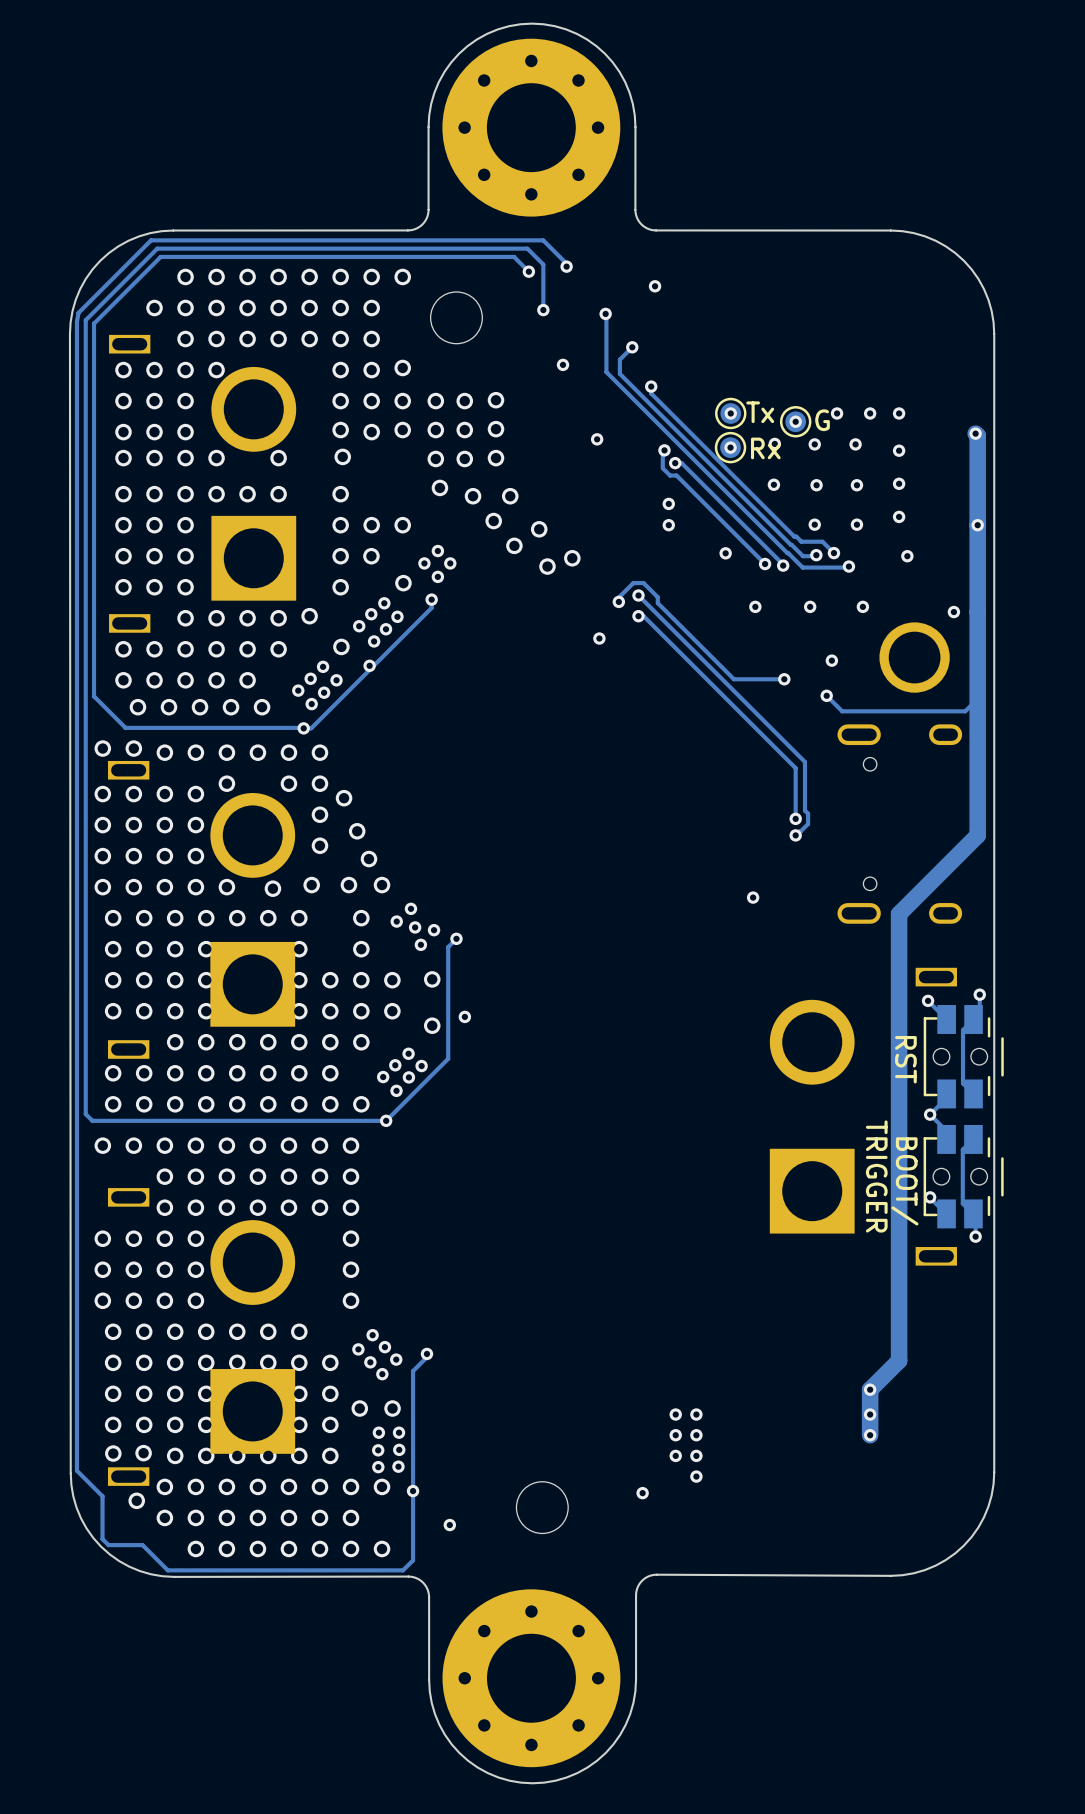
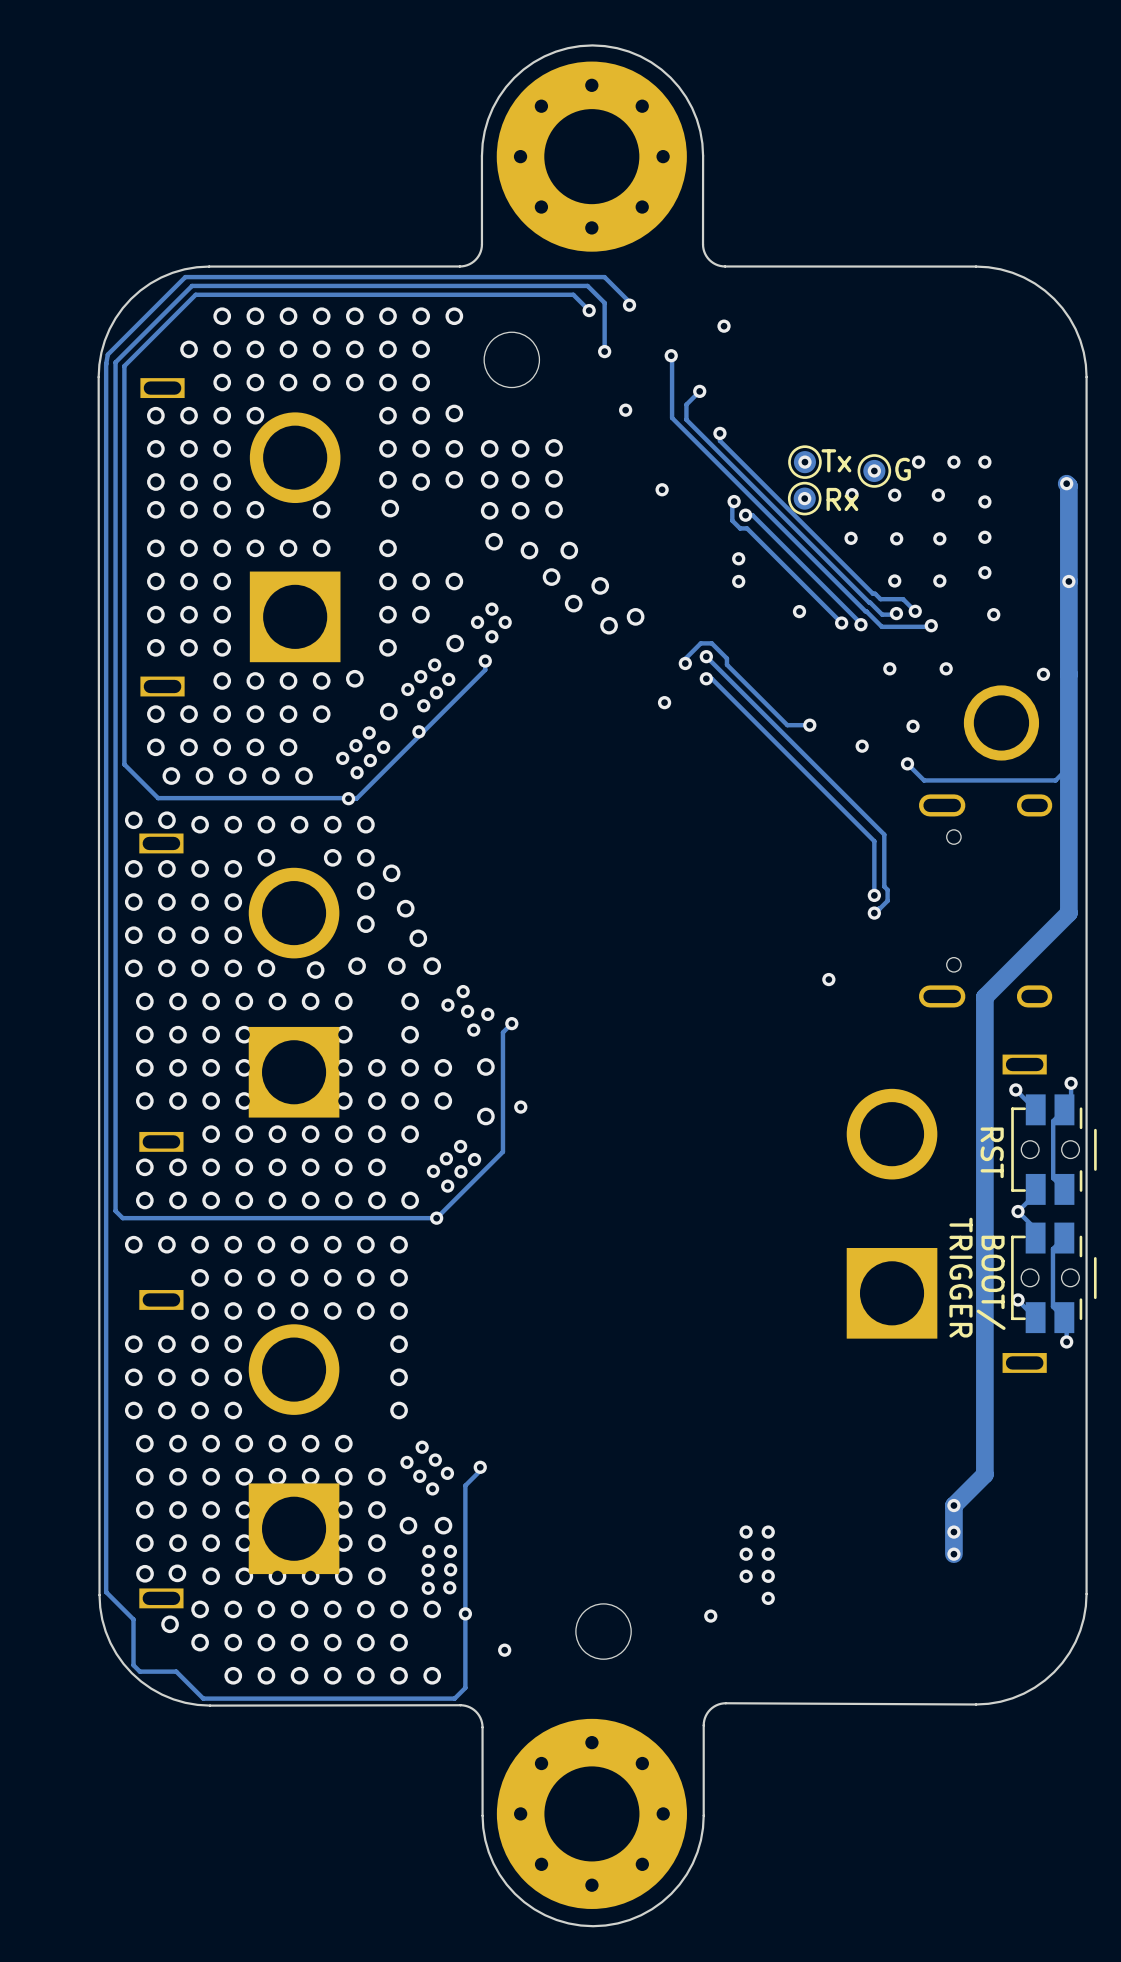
via position: (755, 606) -> (809, 725)
track: (714, 659) (733, 679) (784, 679) -> (787, 725) (809, 725)

